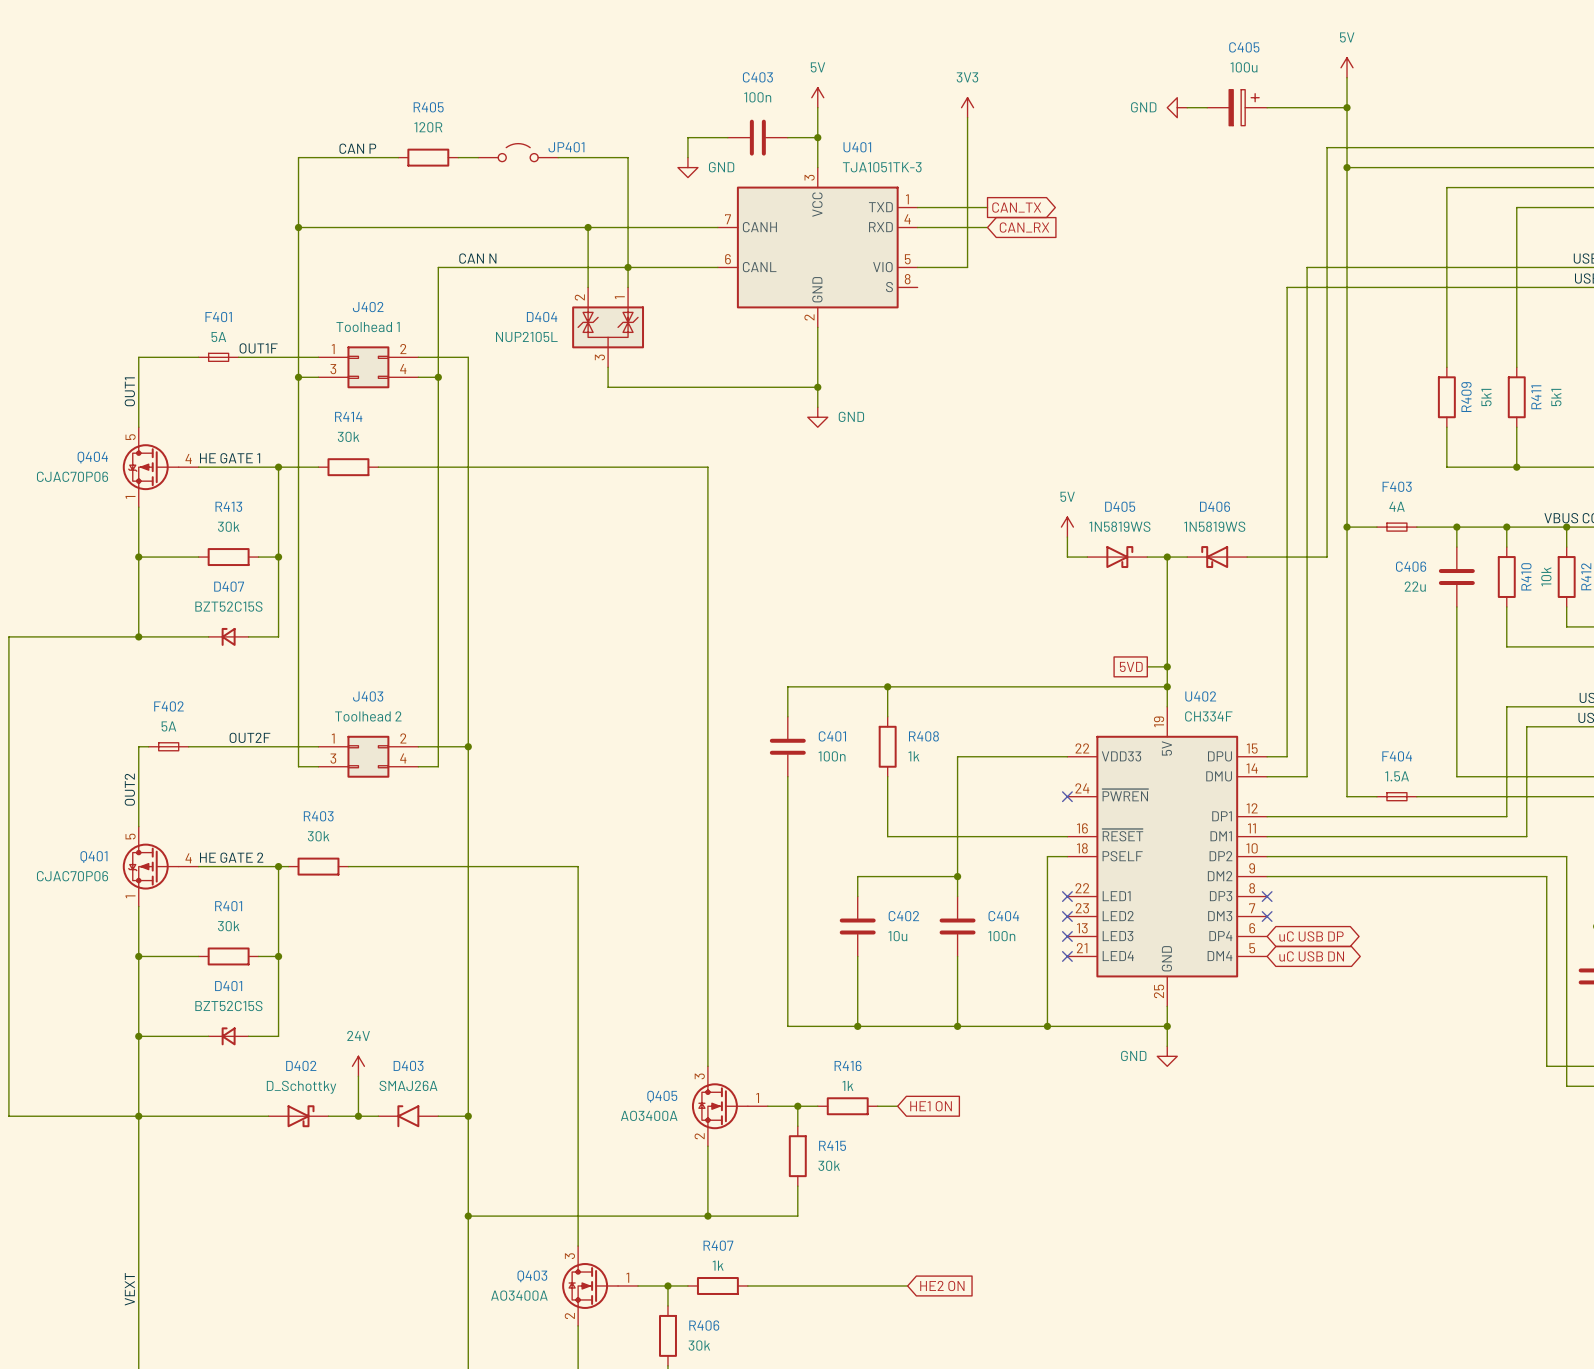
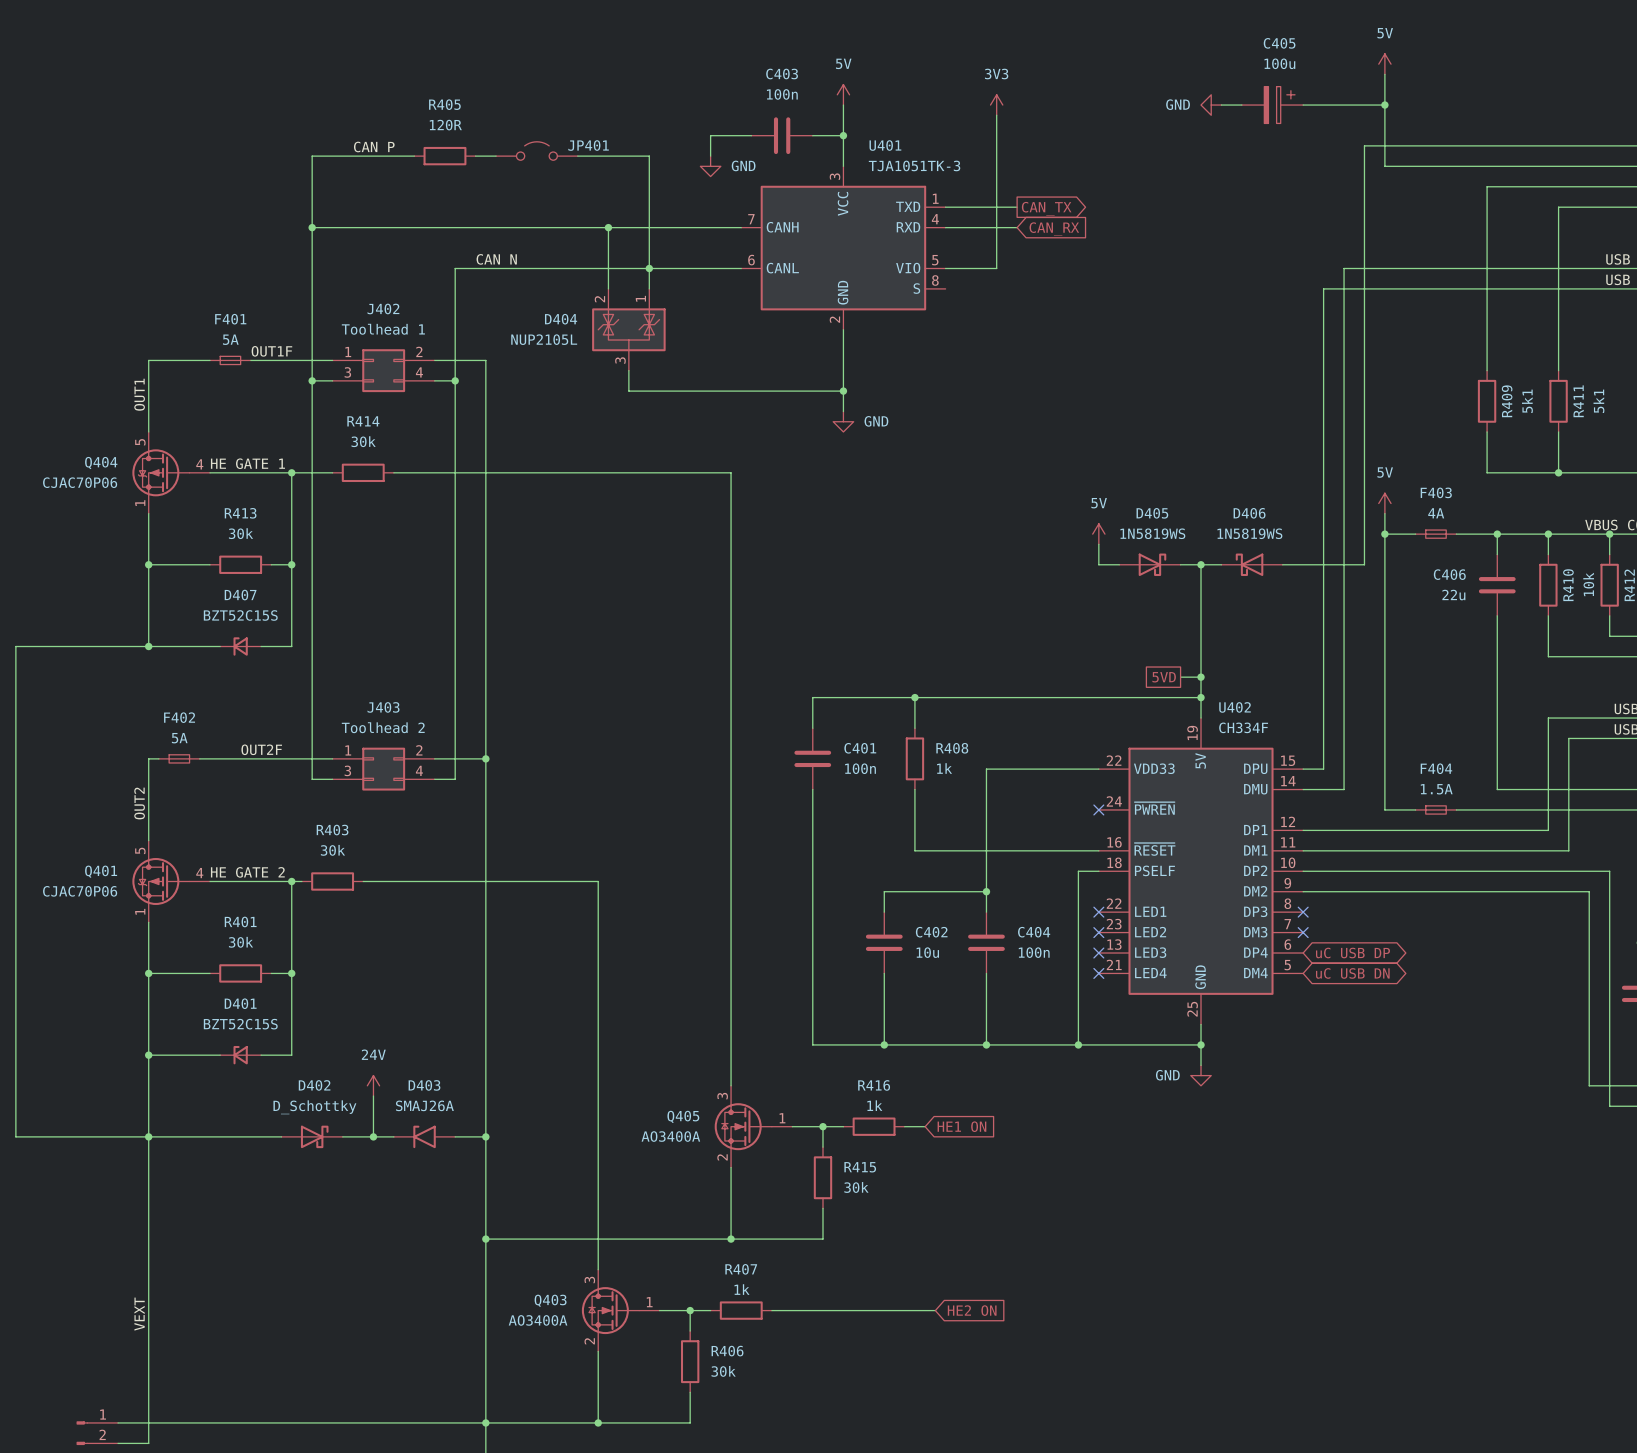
wire: (1347, 167) (1347, 507) -> none
junction: (1347, 167) -> none
power symbol: none -> 5V (1384, 503)

